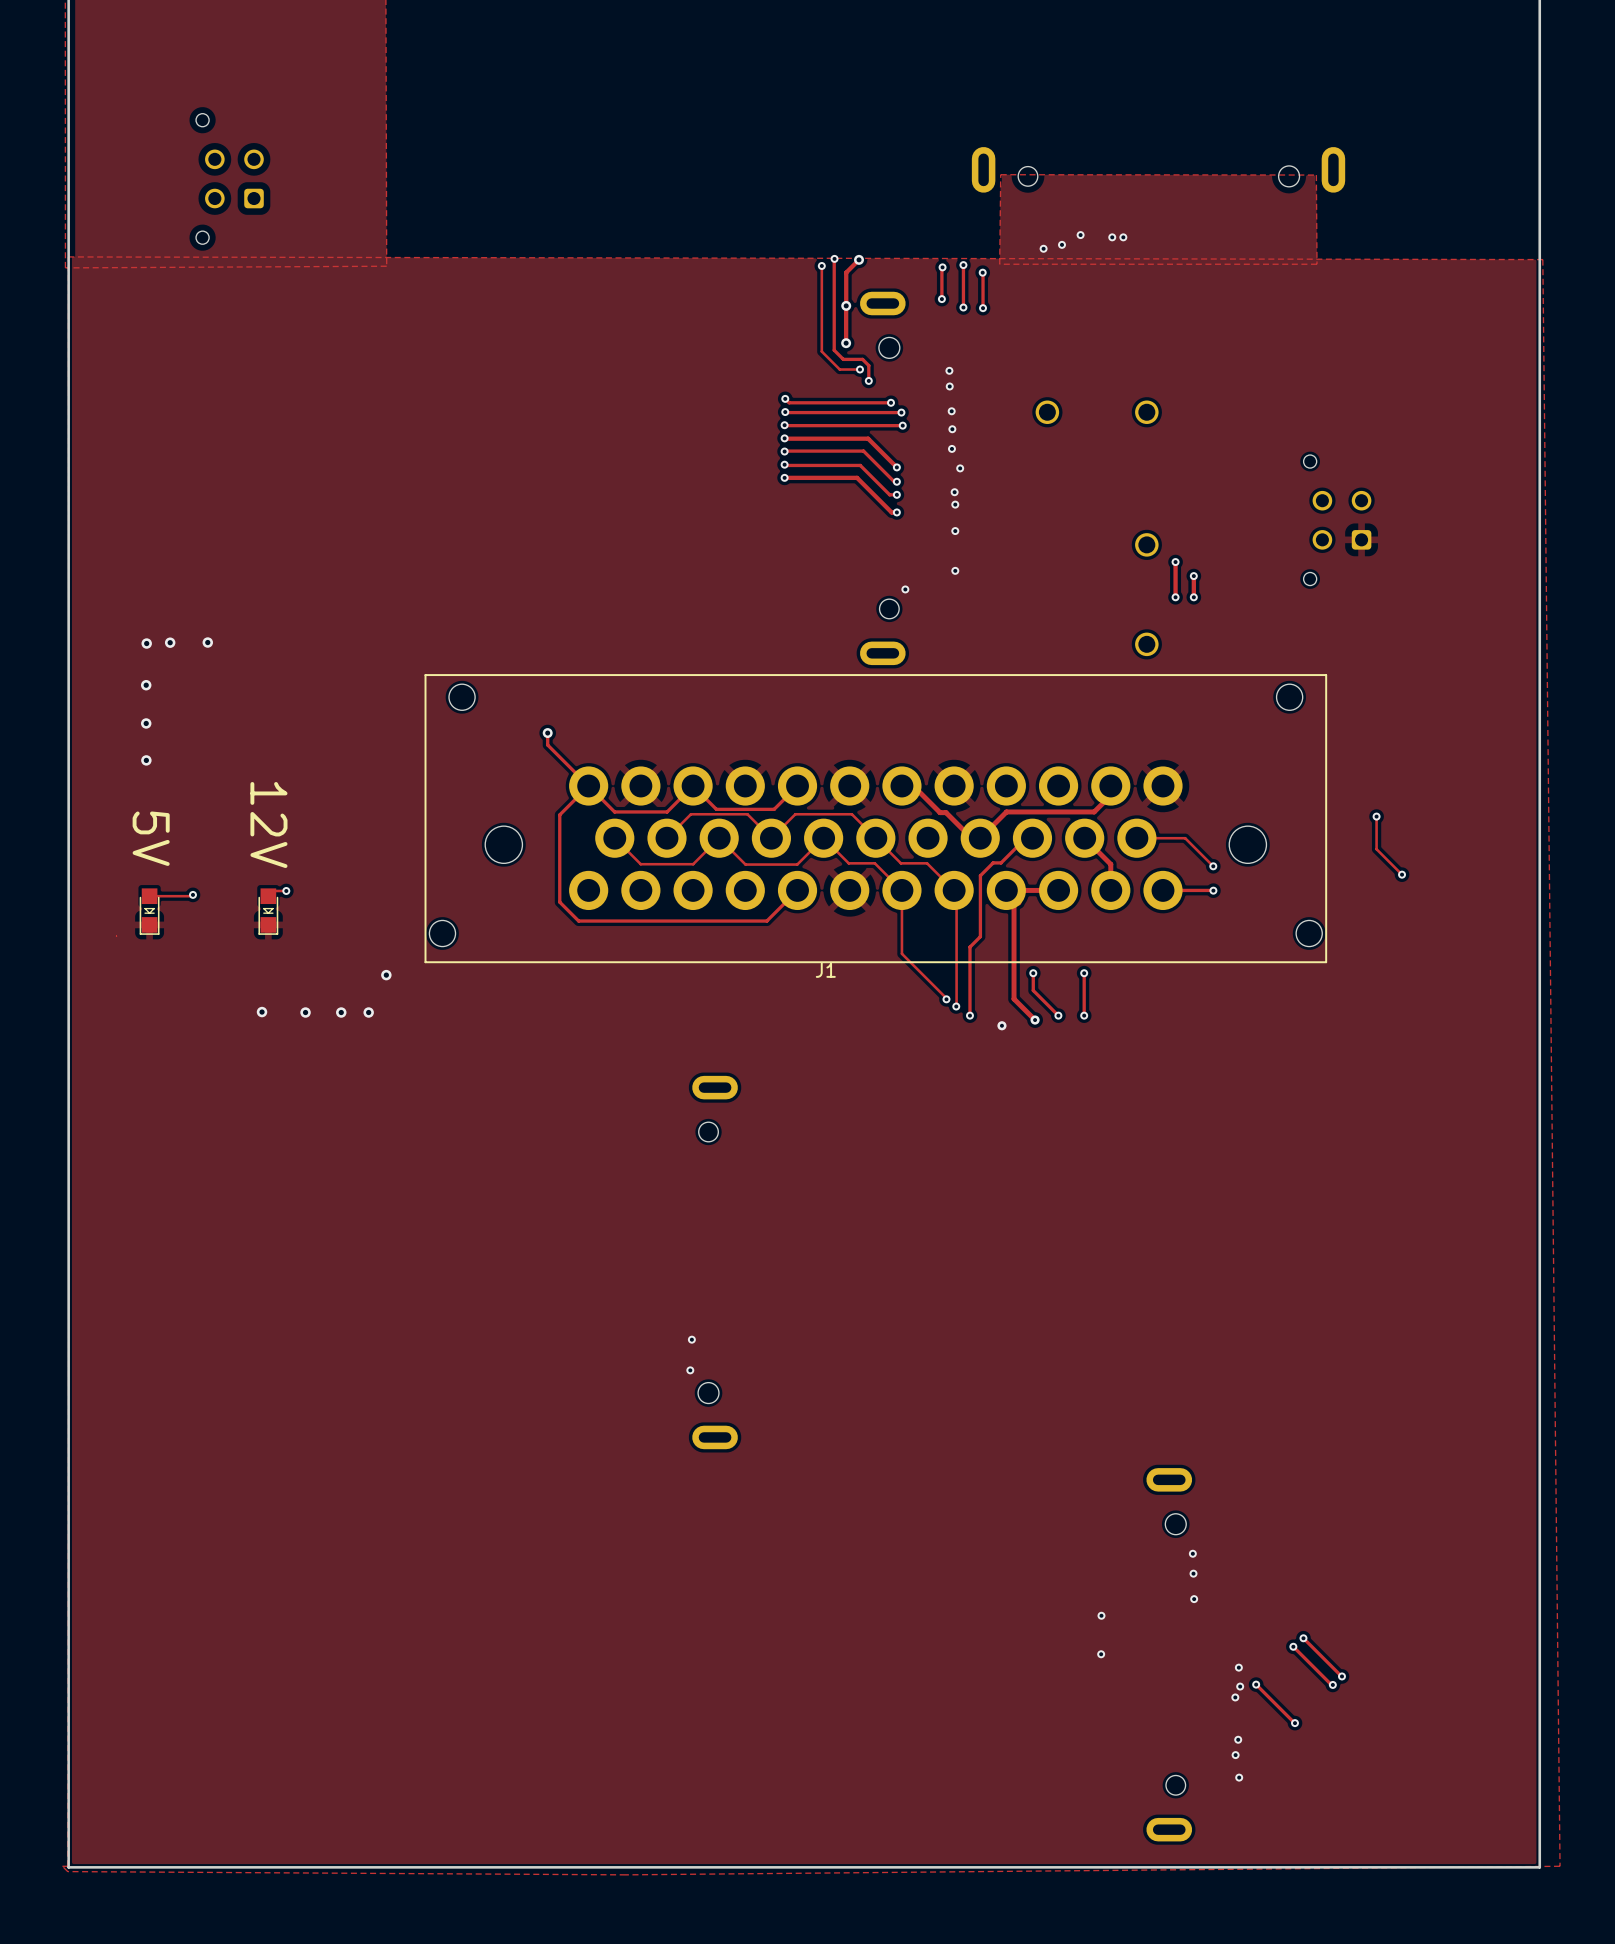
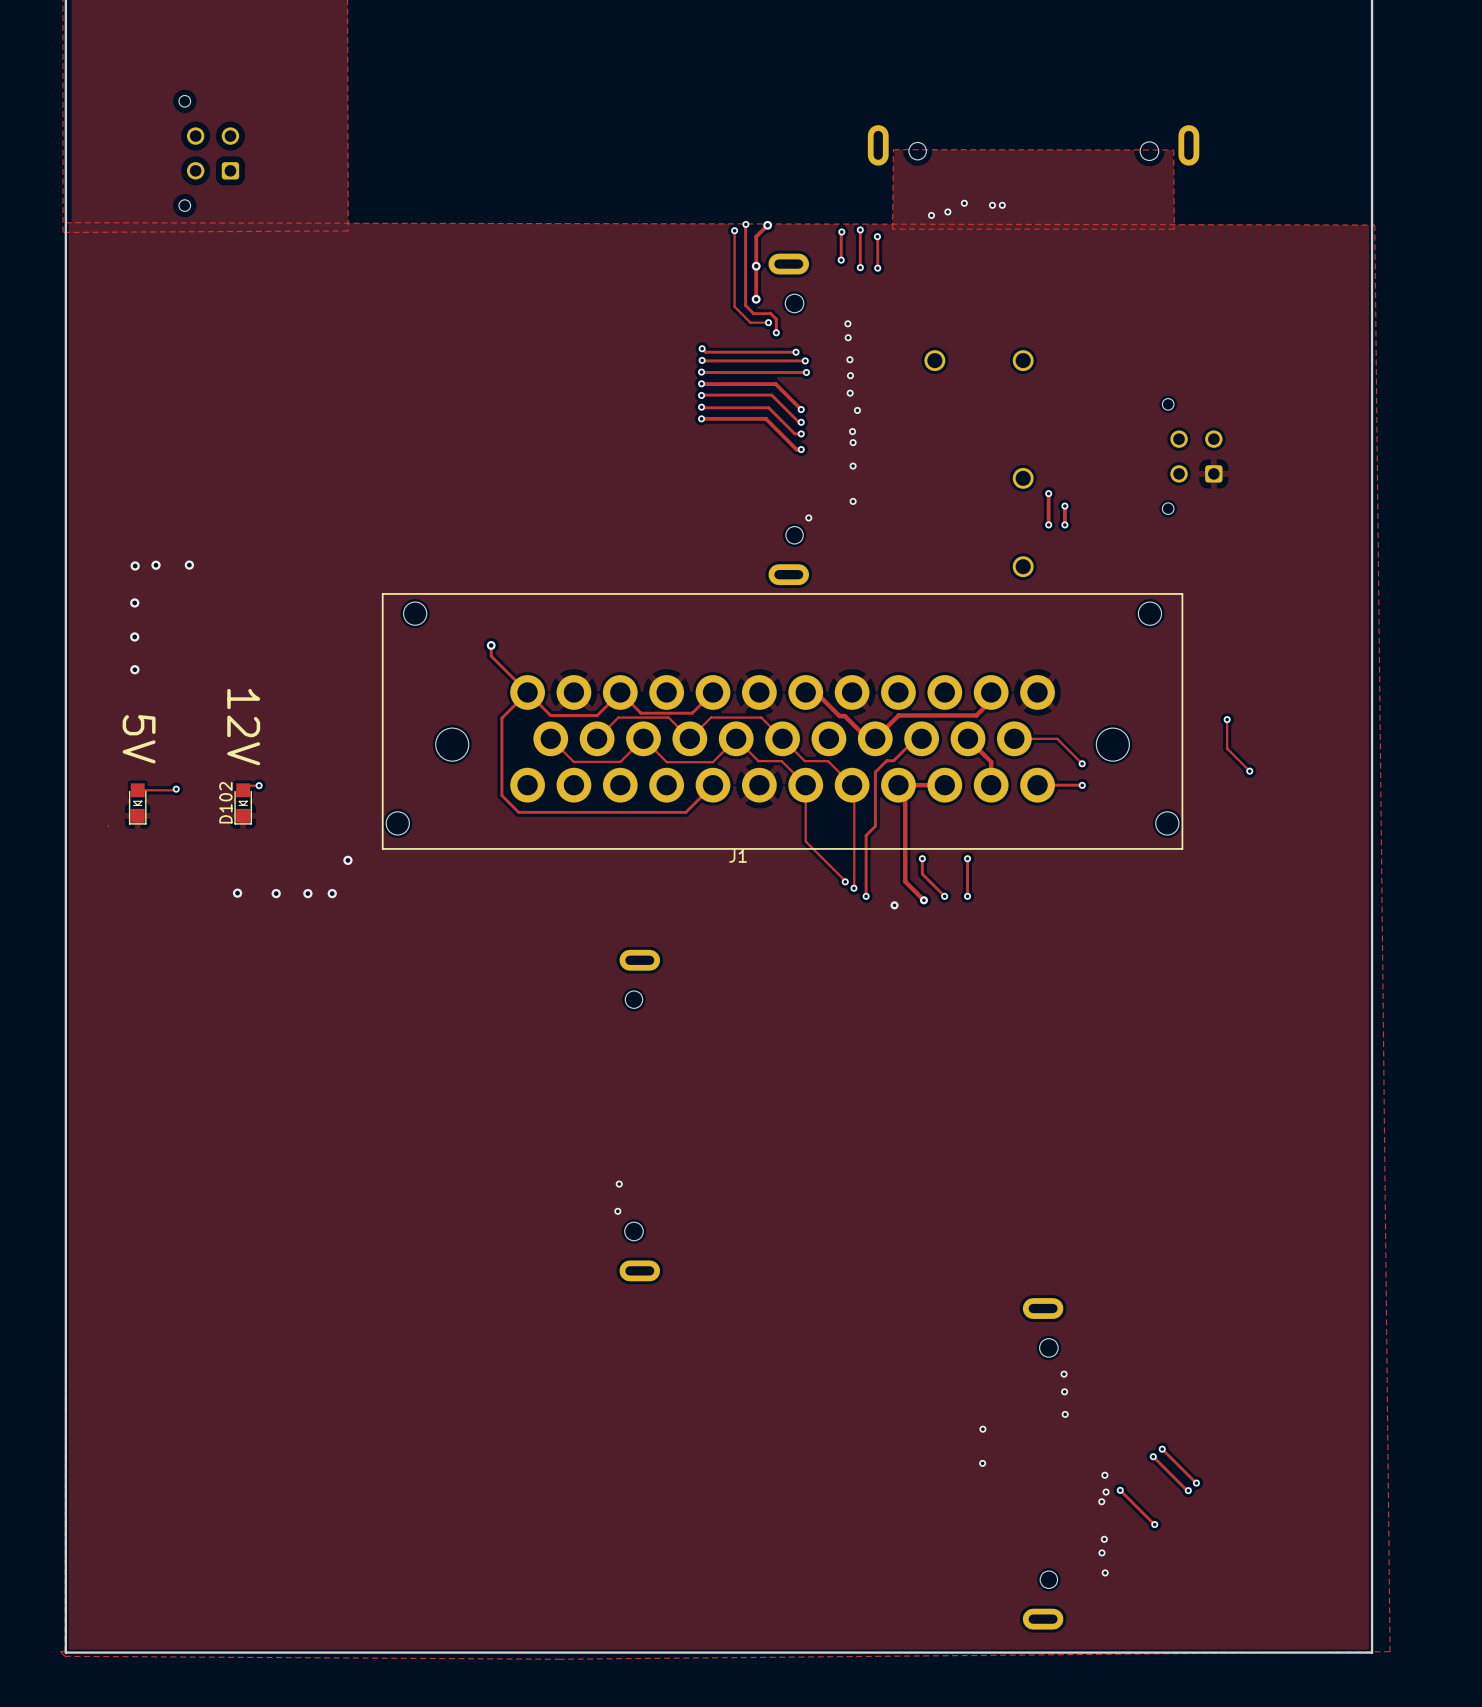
D102 name: none -> D102 (225, 802)

